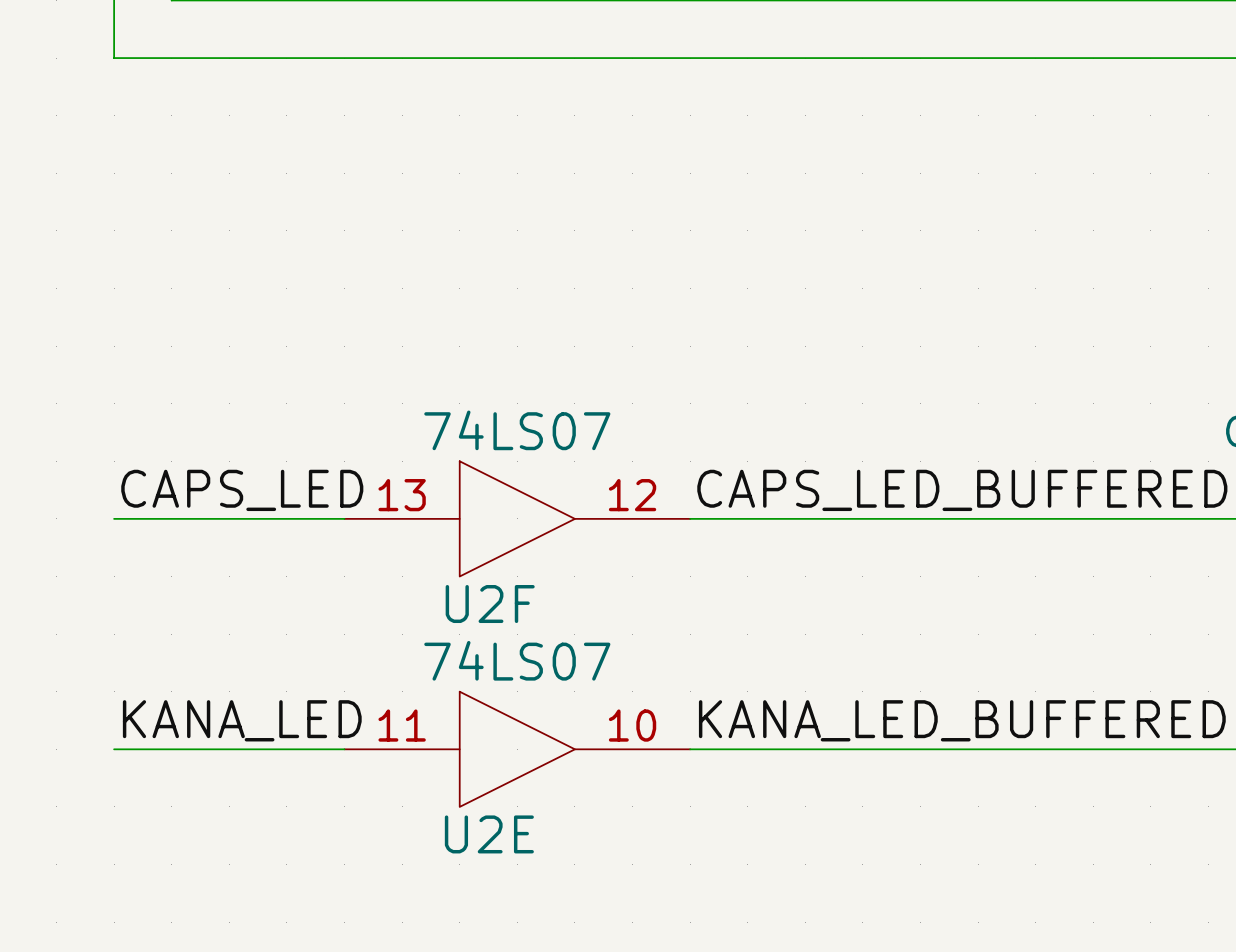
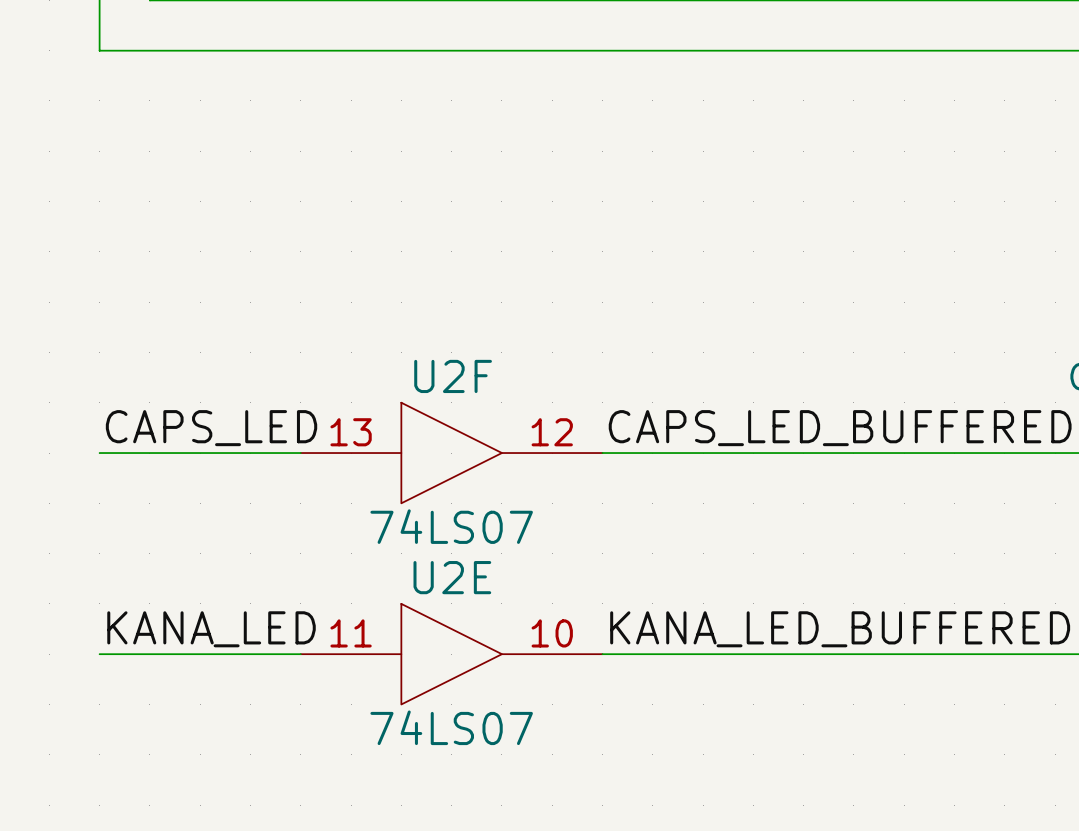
U2F value position: 74LS07 (517, 430) -> 74LS07 (451, 526)
U2F name position: U2F (490, 604) -> U2F (453, 376)
U2E value position: 74LS07 (517, 660) -> 74LS07 (451, 727)
U2E name position: U2E (489, 834) -> U2E (452, 577)

